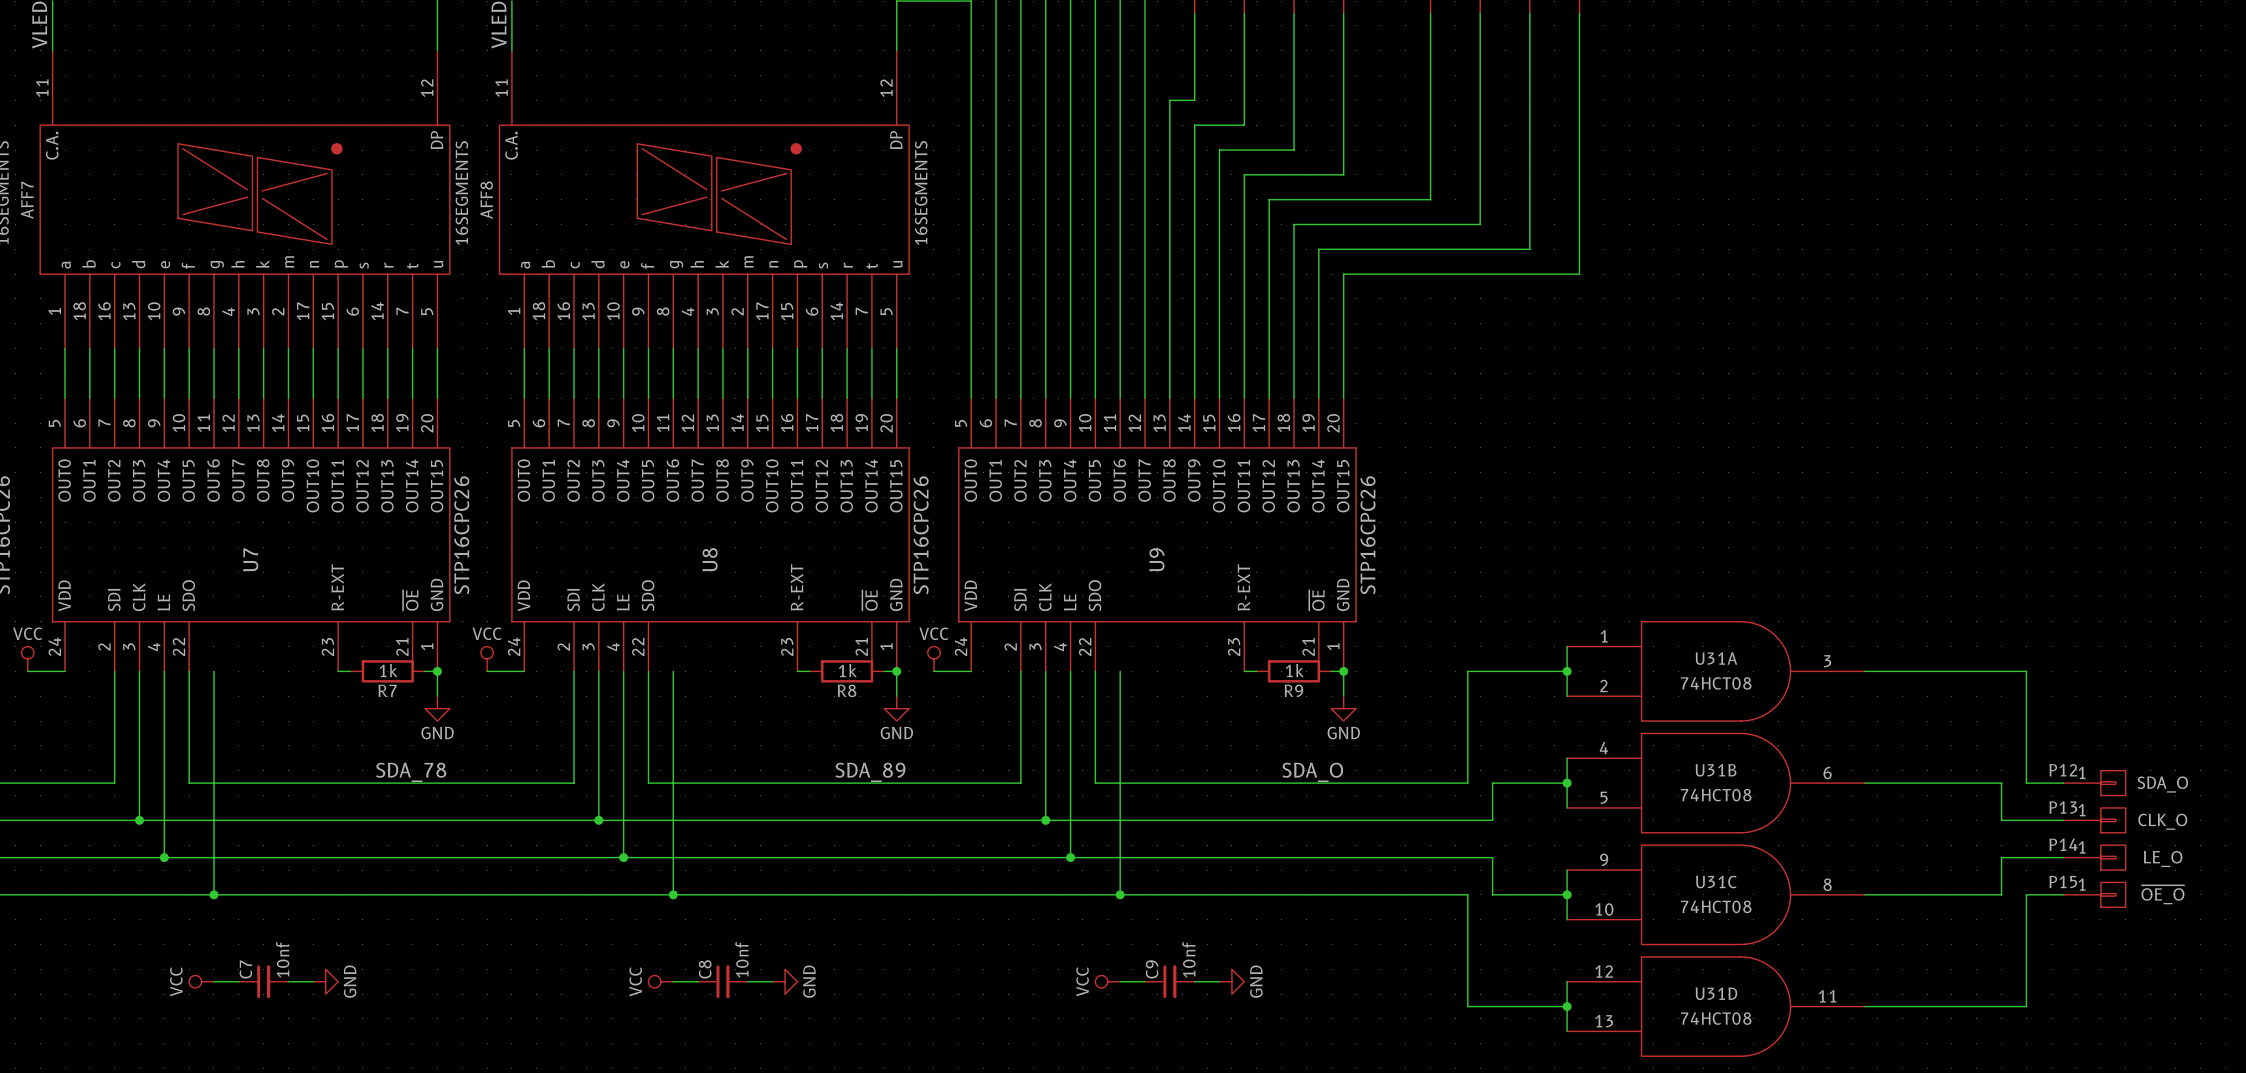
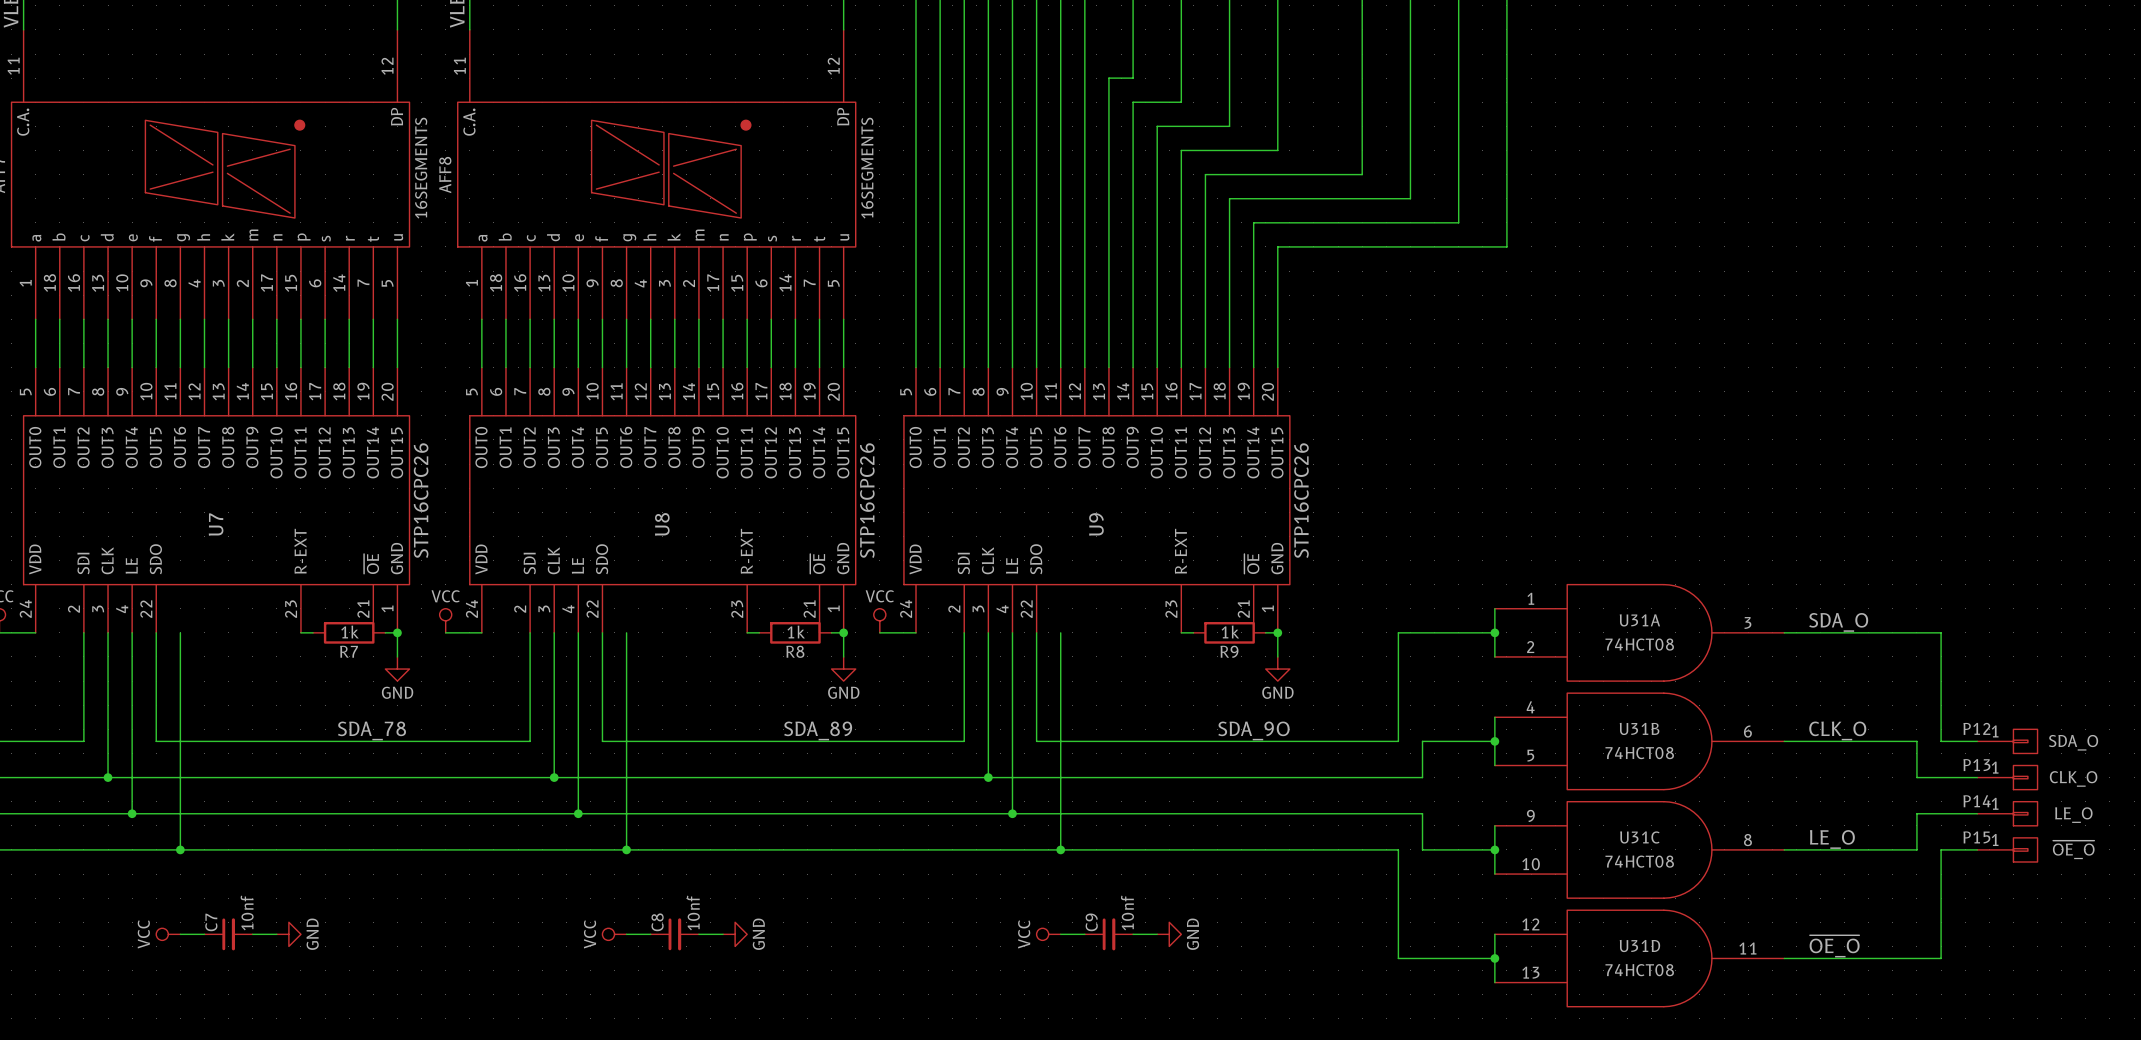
label: none -> SDA_O (1838, 622)
label: SDA_O (1312, 772) -> SDA_9O (1253, 730)
label: none -> CLK_O (1837, 730)
label: none -> LE_O (1832, 839)
label: none -> ~{OE_O} (1834, 946)

